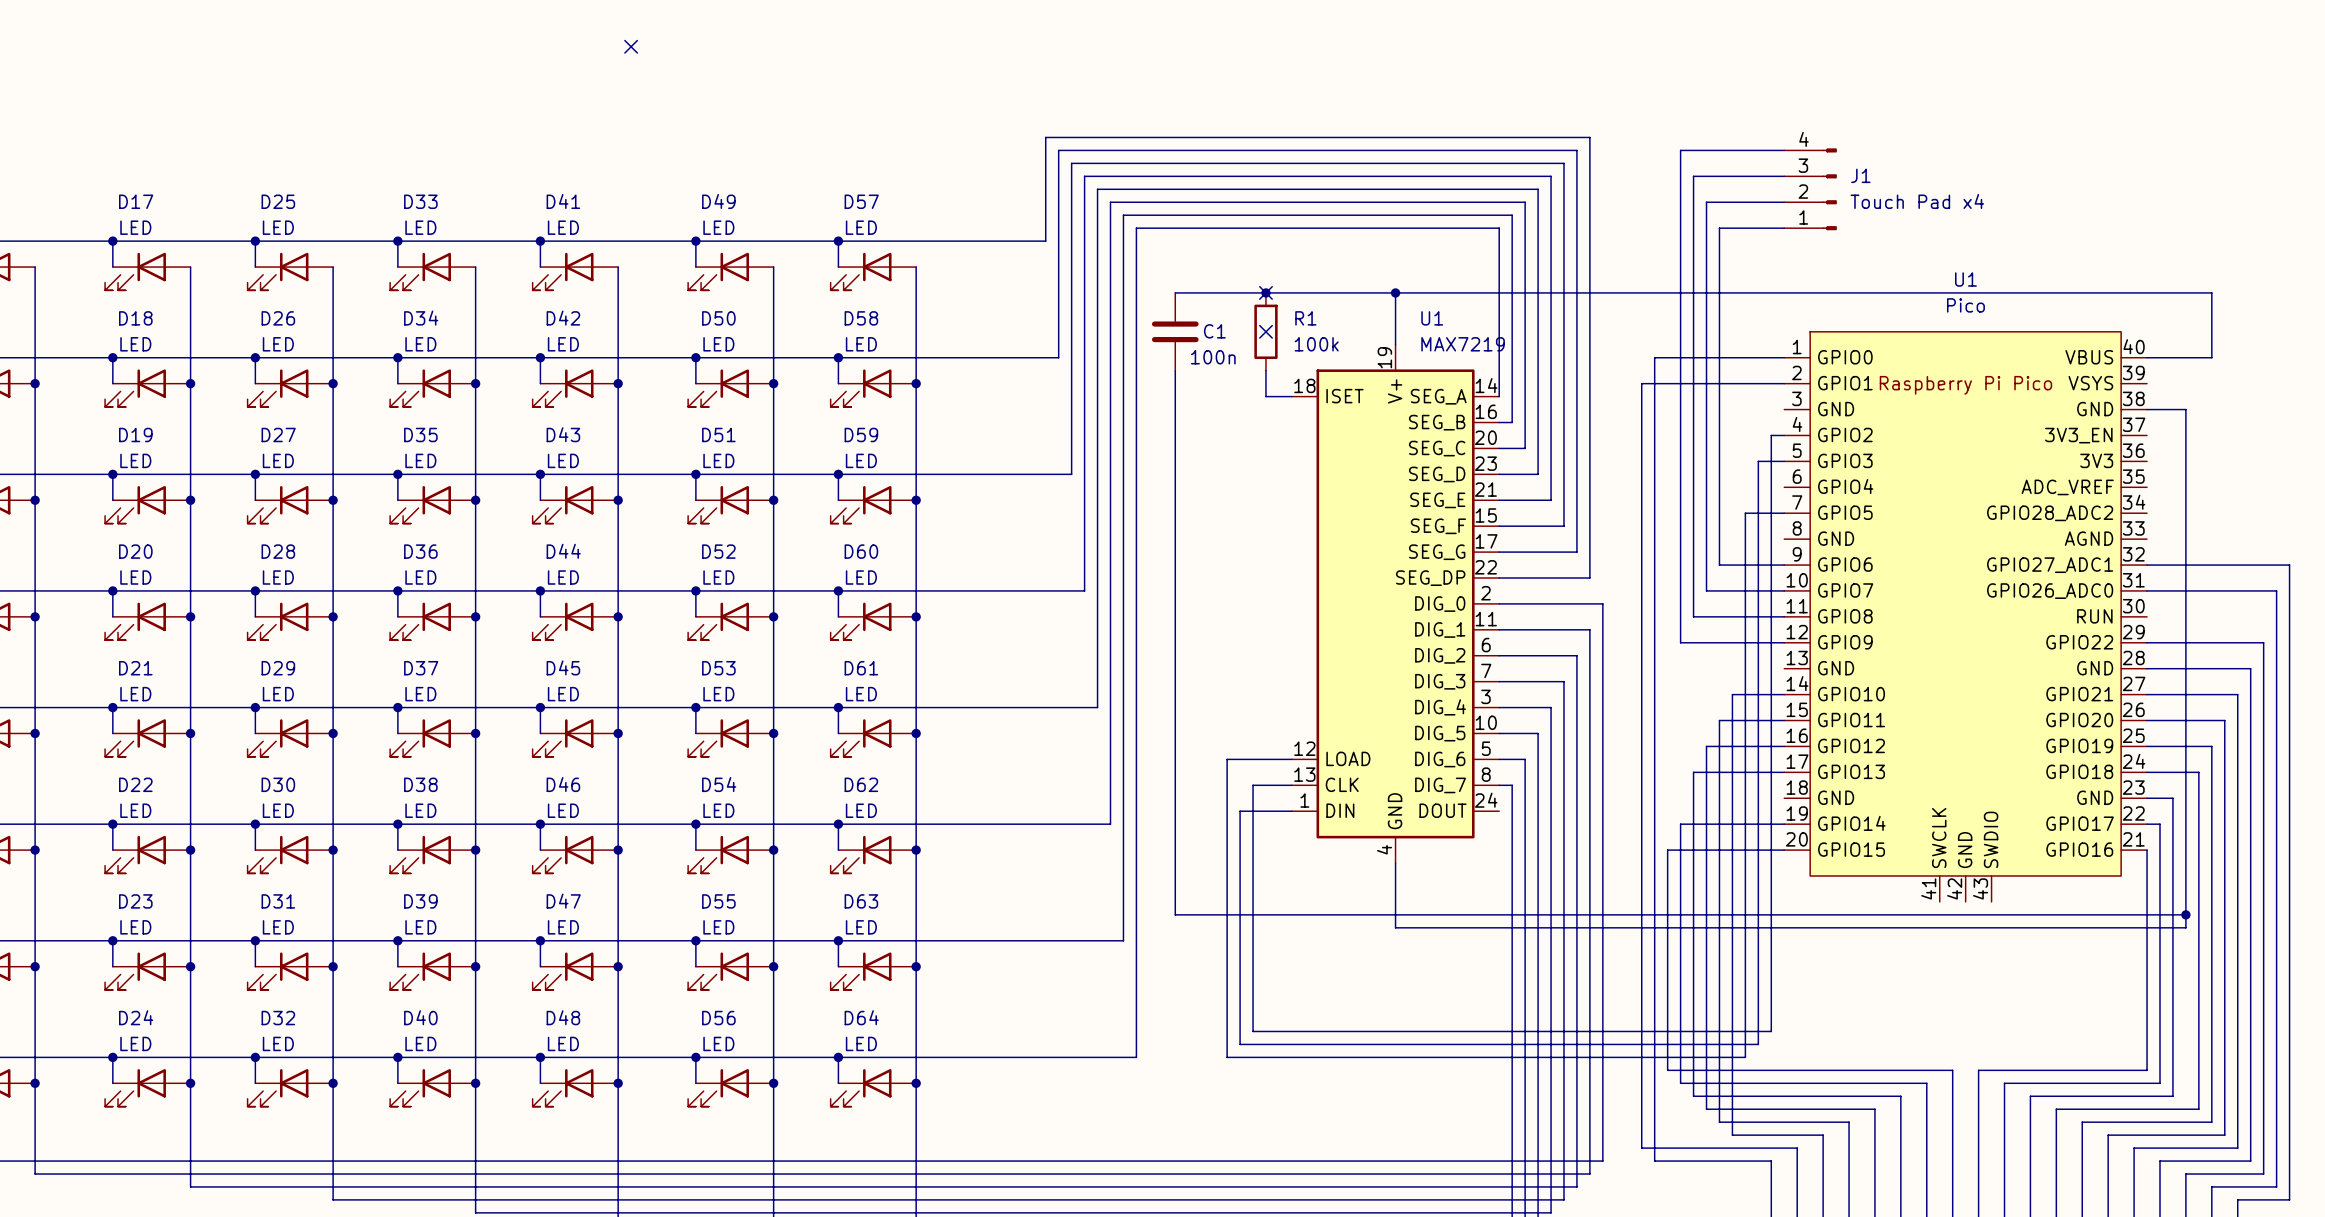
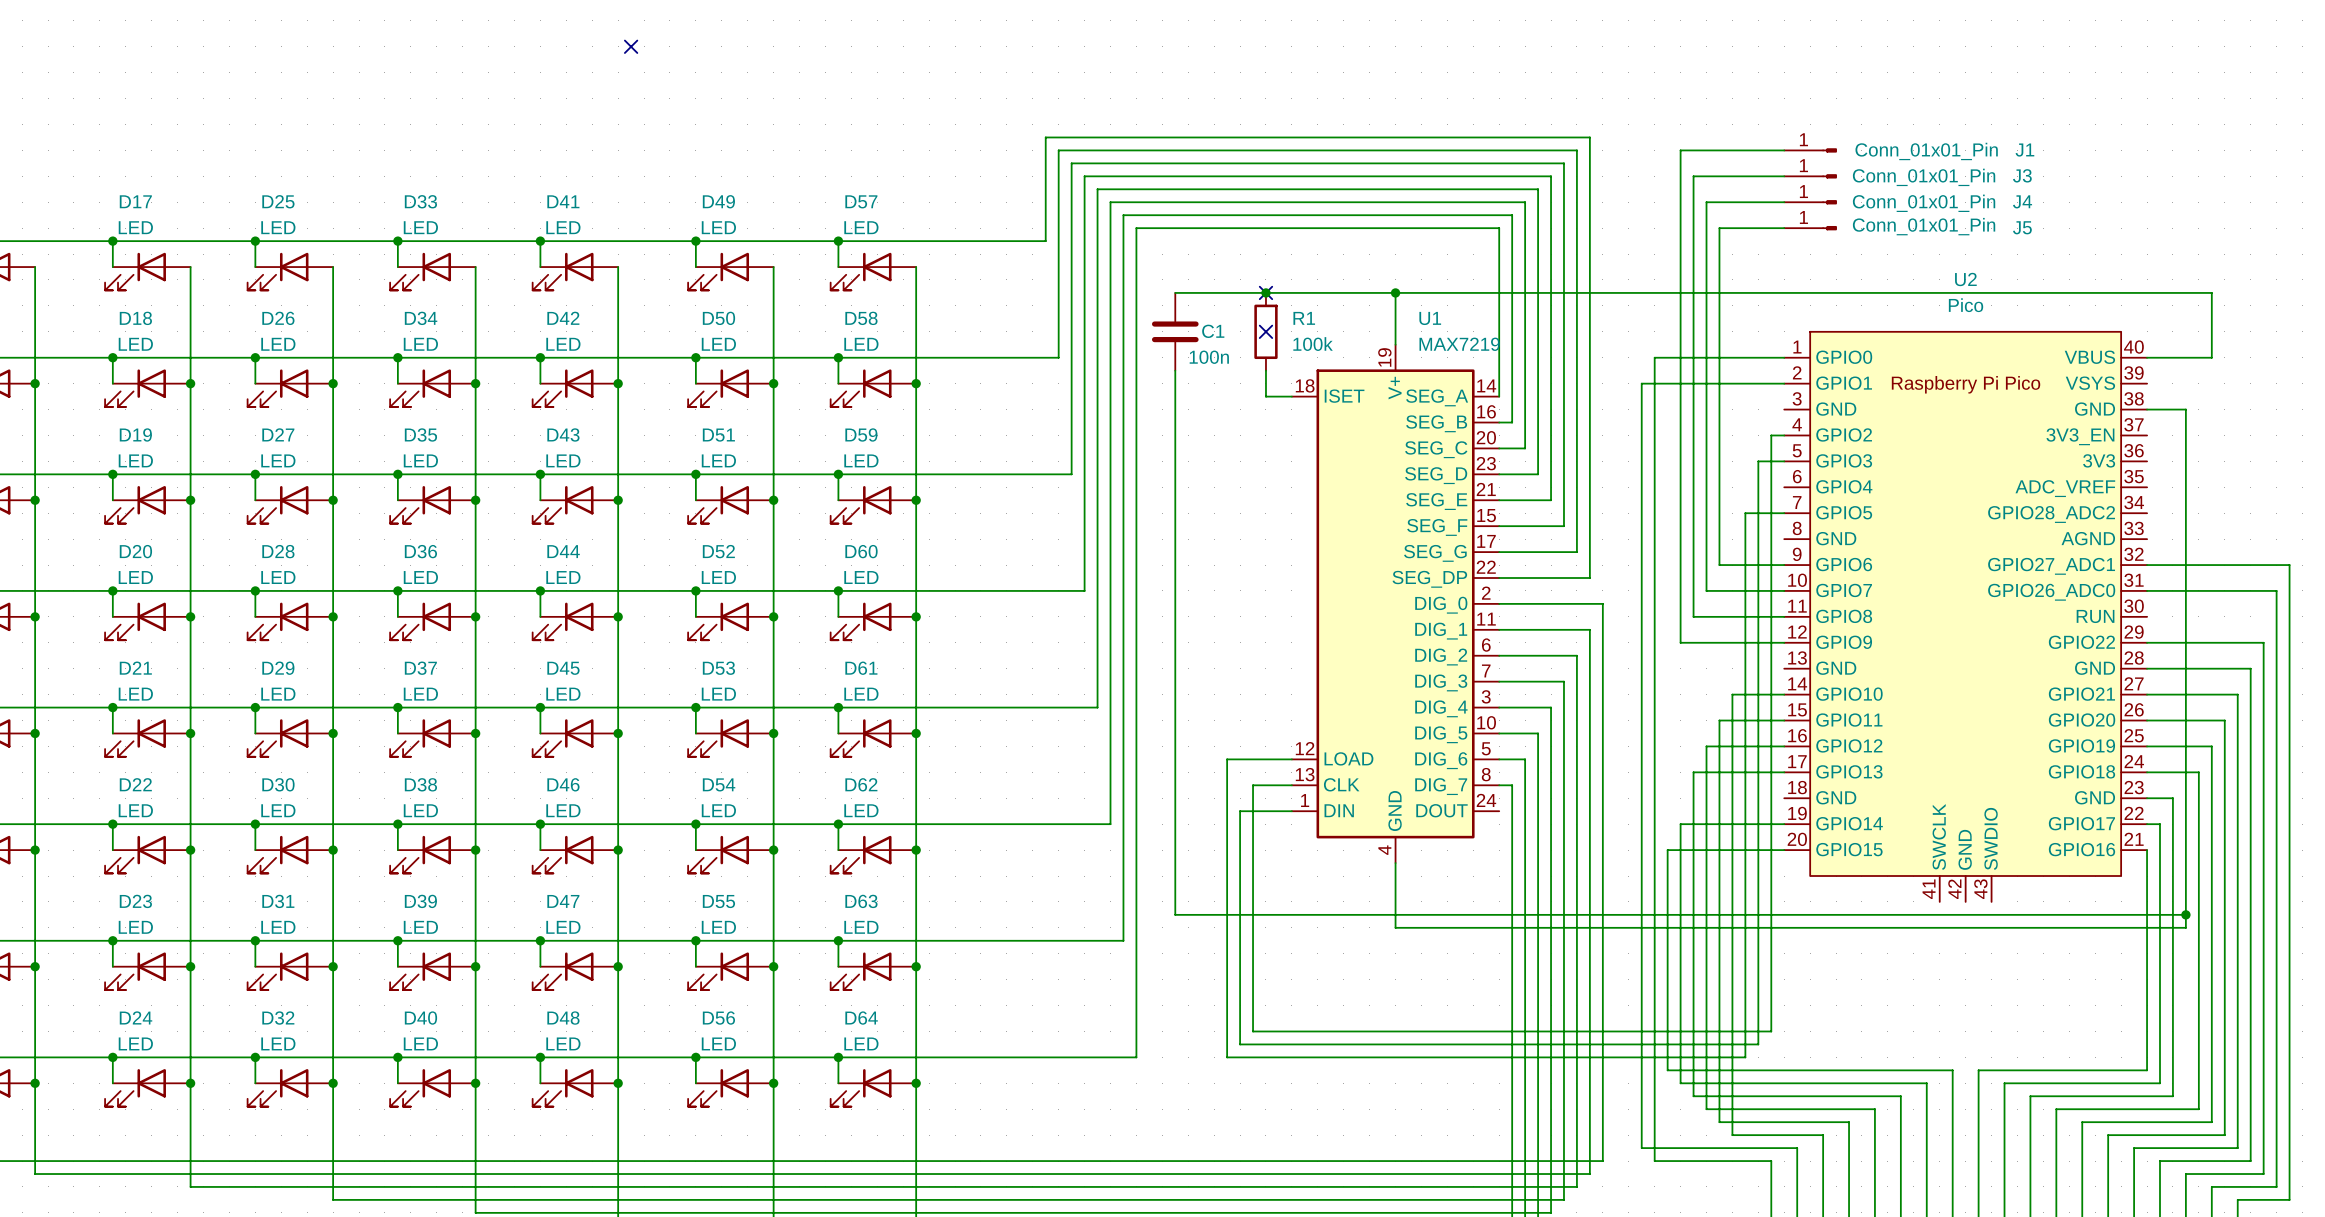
J1 symbol: [1784, 148, 1837, 231] -> [1784, 148, 1837, 153]
J1 name position: J1 (1860, 175) -> J1 (2024, 150)
J3: none -> Conn_01x01_Pin (1810, 176)
J1 value: Touch Pad x4 (1917, 201) -> Conn_01x01_Pin (1926, 151)
J4: none -> Conn_01x01_Pin (1810, 202)
J5: none -> Conn_01x01_Pin (1810, 228)
U1 name: U1 (1965, 279) -> U2 (1965, 279)

